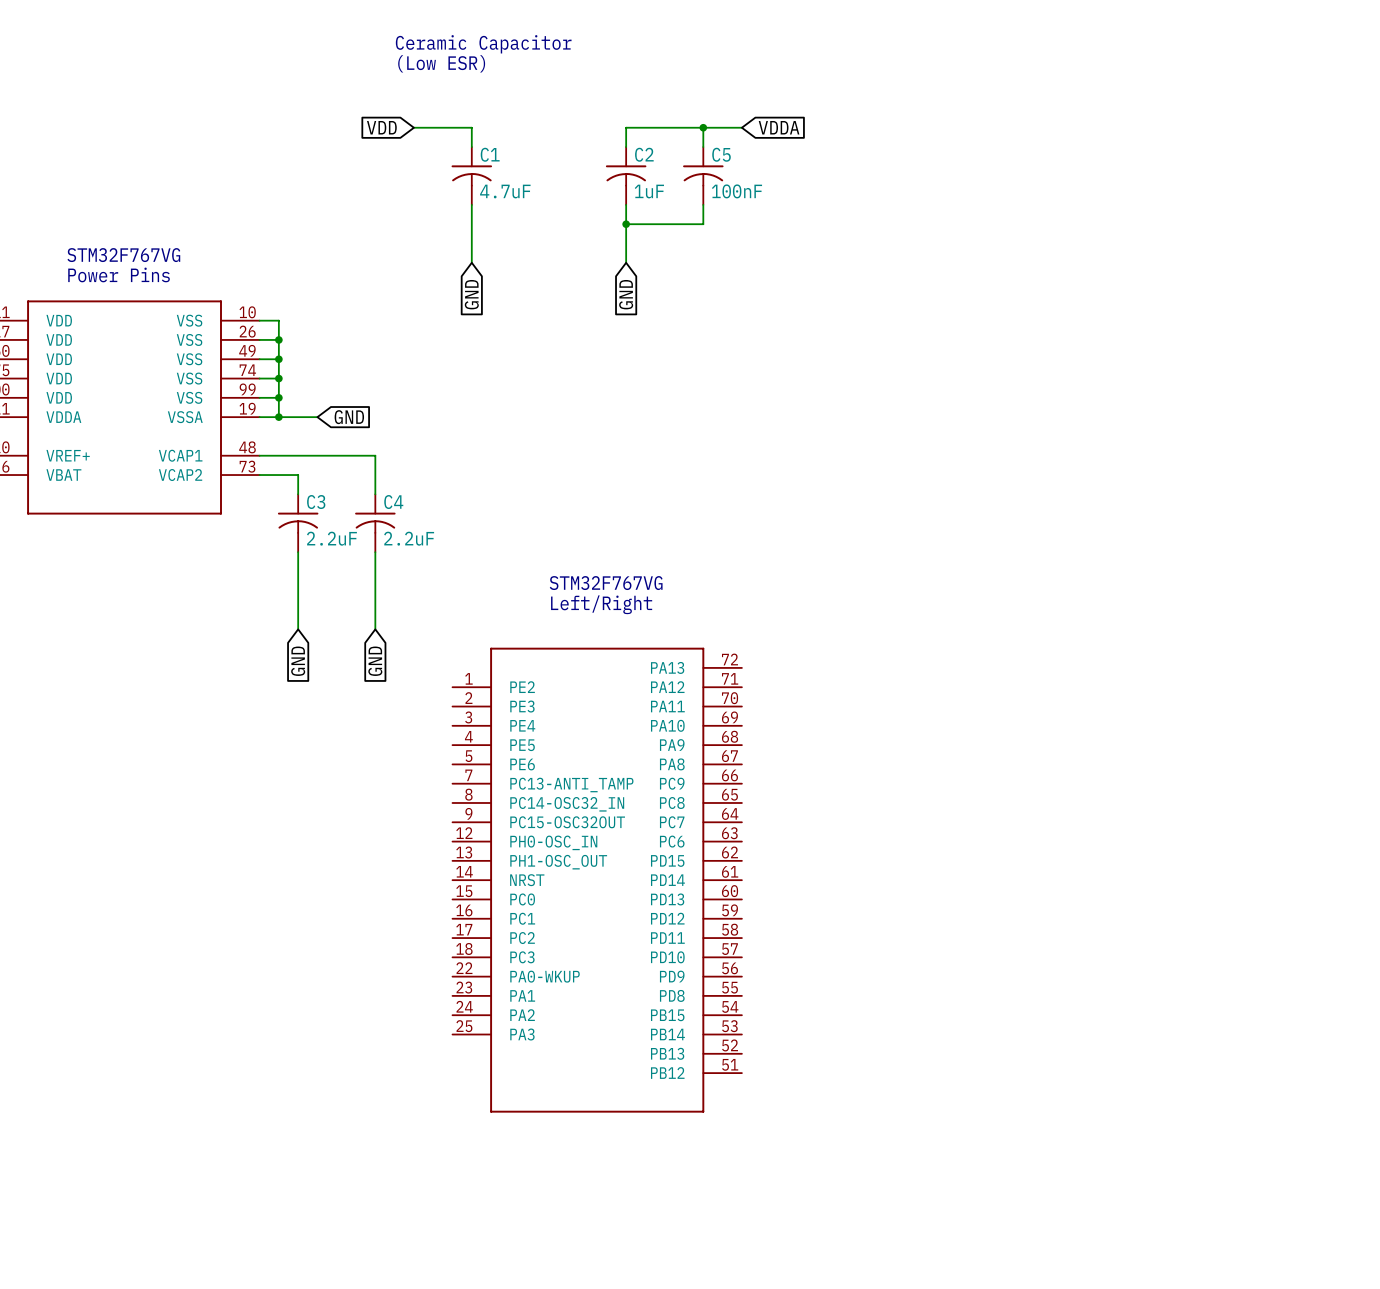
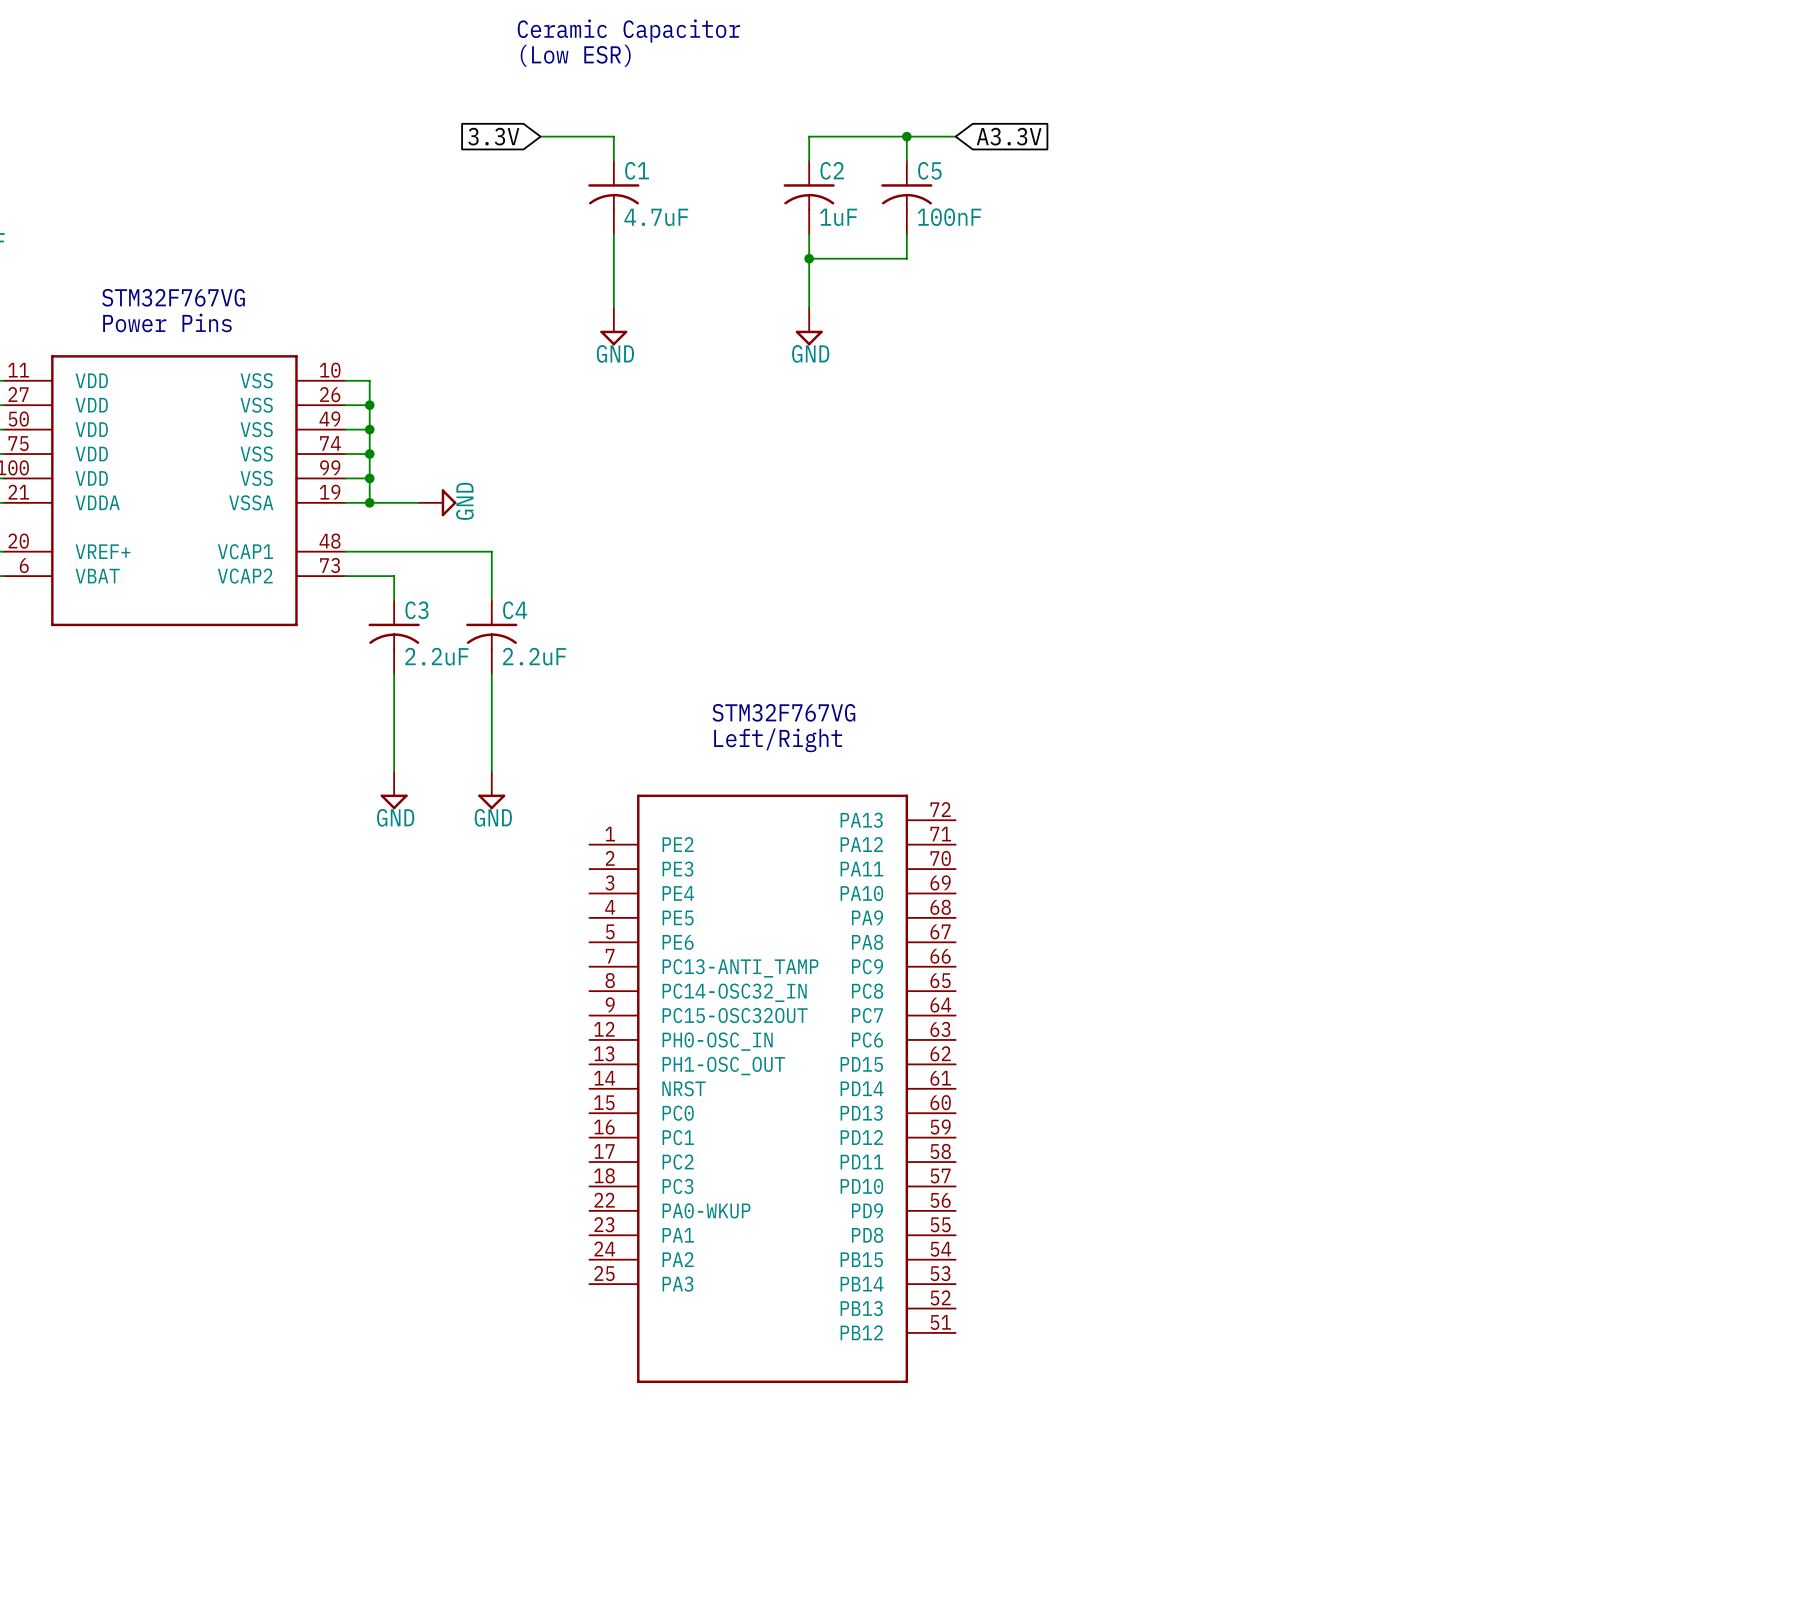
global label: VDD (381, 127) -> 3.3V (493, 136)
global label: VDDA (779, 127) -> A3.3V (1009, 136)
power symbol: none -> GND (613, 326)
power symbol: none -> GND (809, 326)
global label: GND (471, 294) -> none
global label: GND (626, 294) -> none
power symbol: none -> GND (437, 502)
global label: GND (349, 417) -> none
power symbol: none -> GND (394, 790)
power symbol: none -> GND (491, 790)
global label: GND (298, 661) -> none
global label: GND (375, 661) -> none

